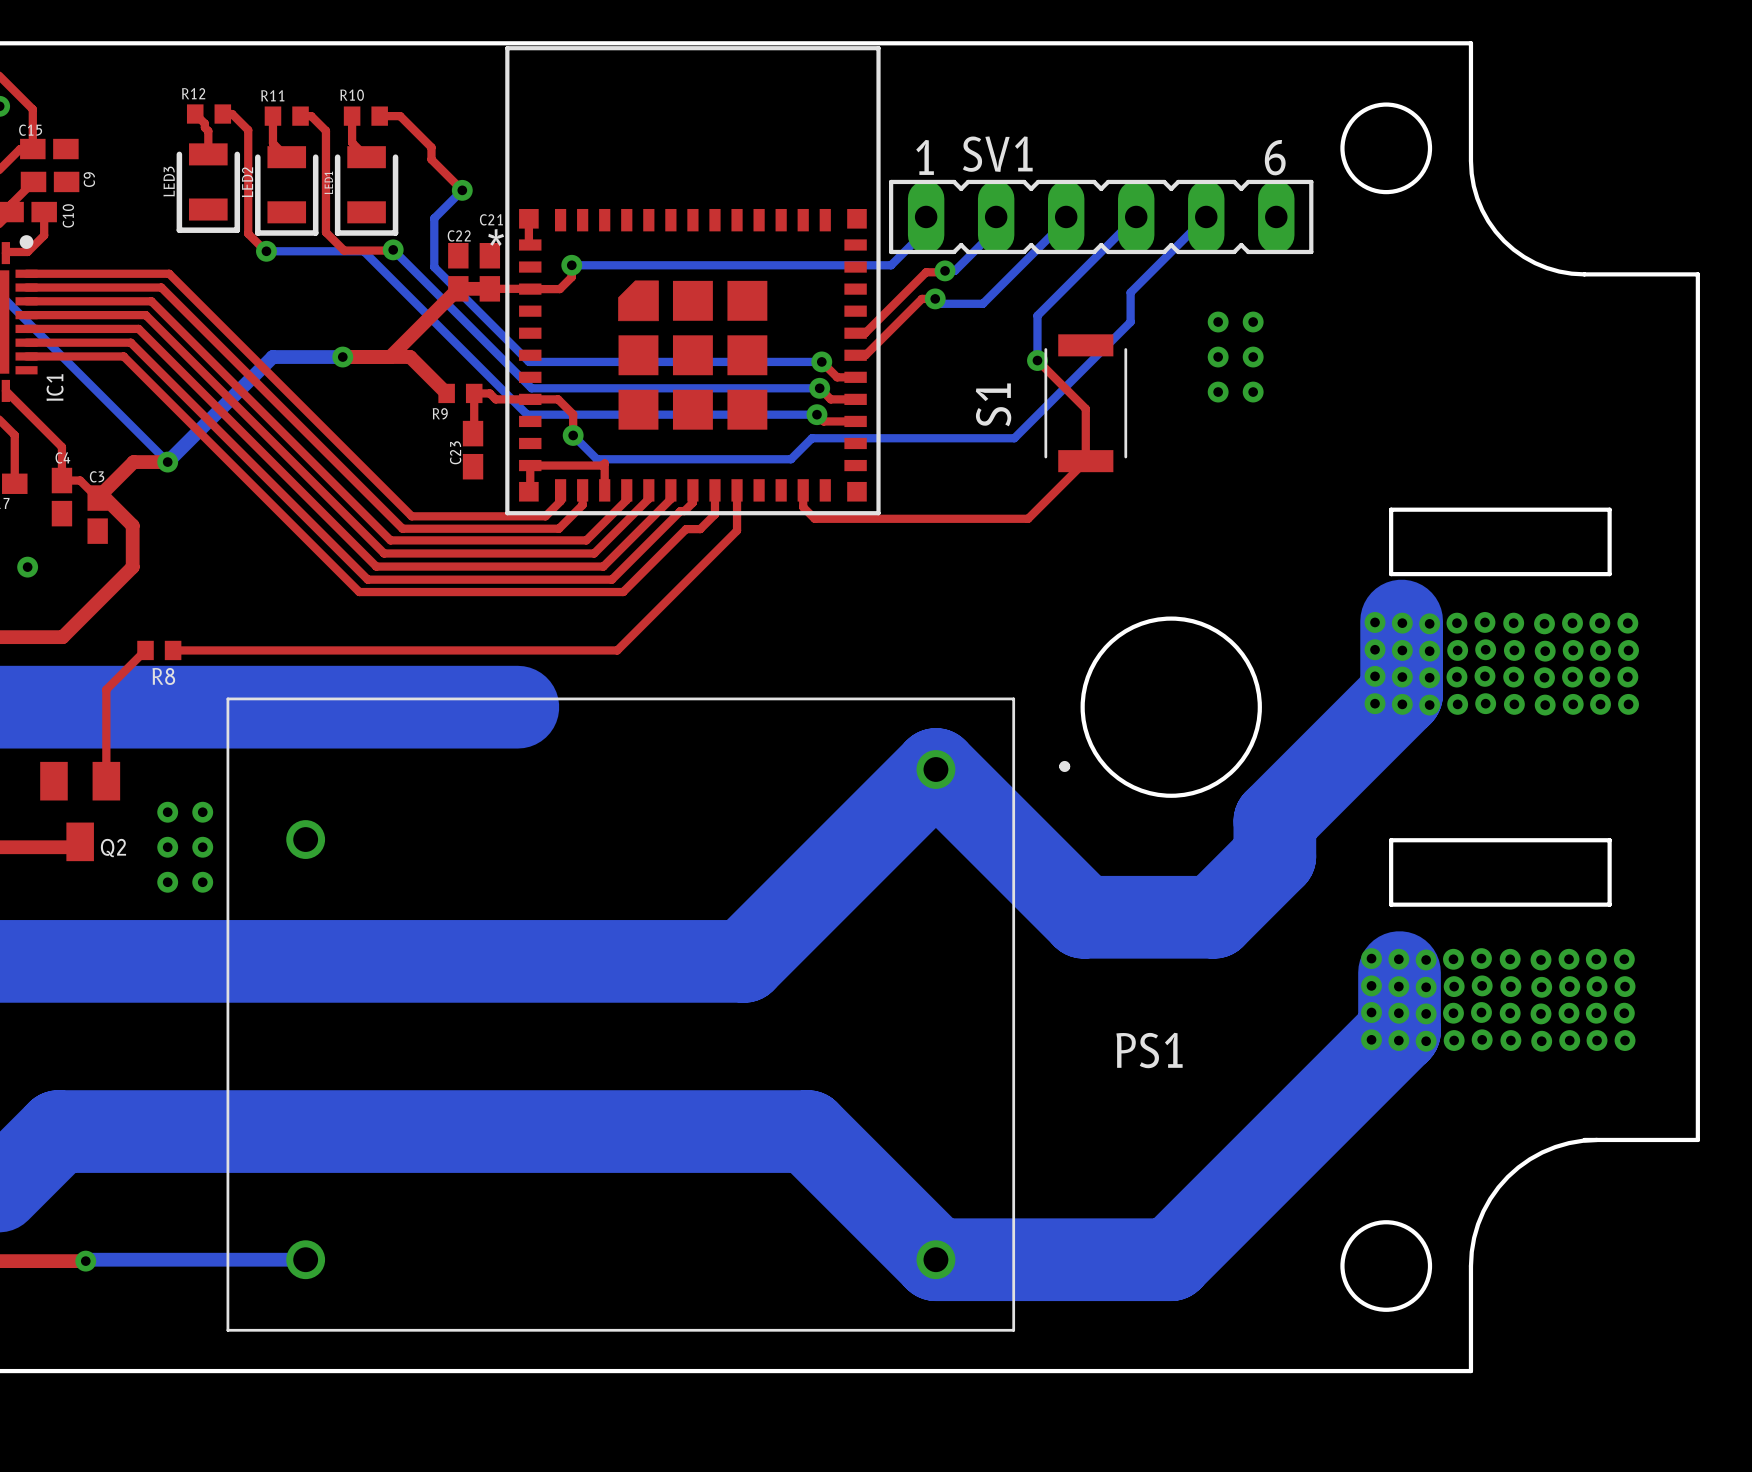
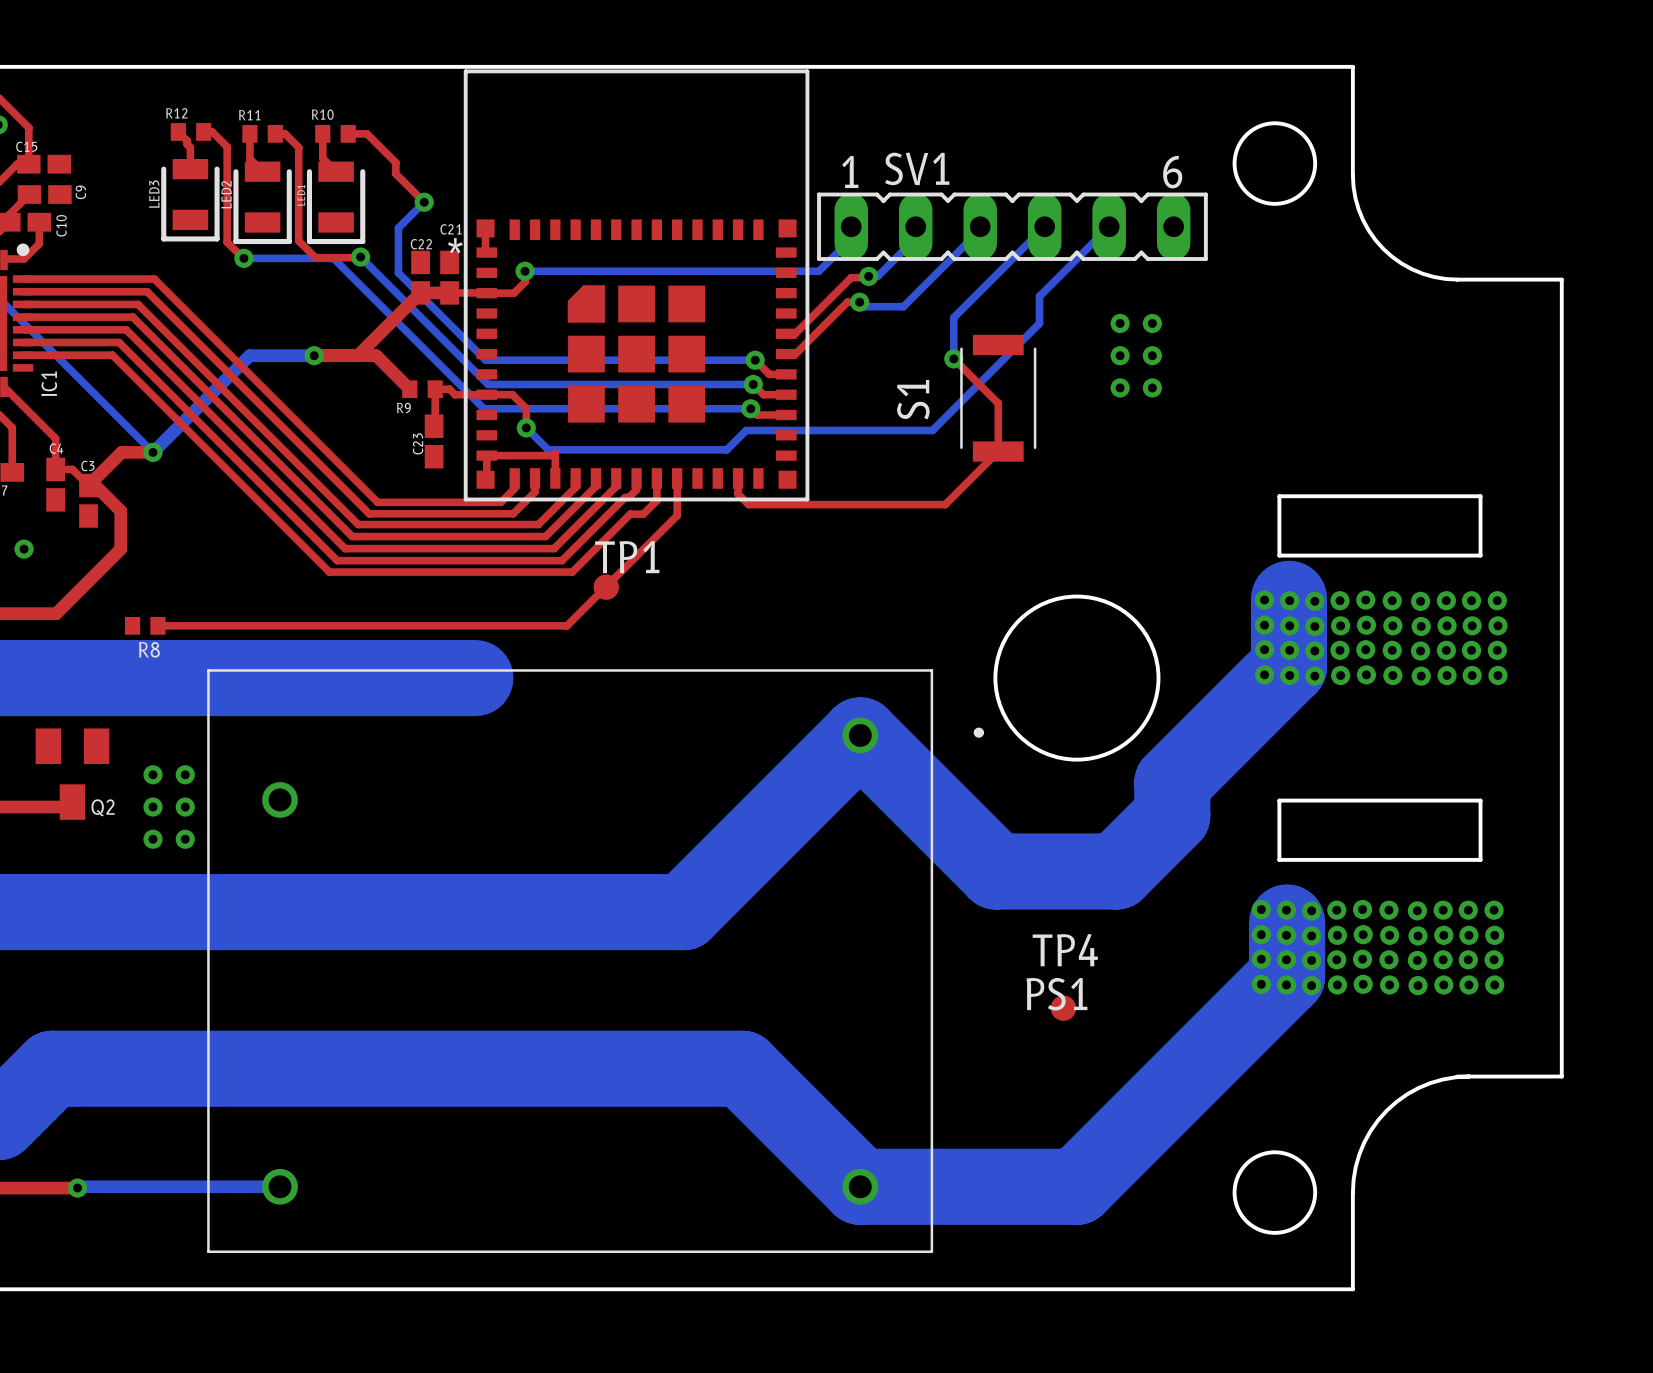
TP1: none -> (606, 587)
top track: (145, 650) (106, 689) (106, 781) -> none
TP4: none -> (1063, 1008)

